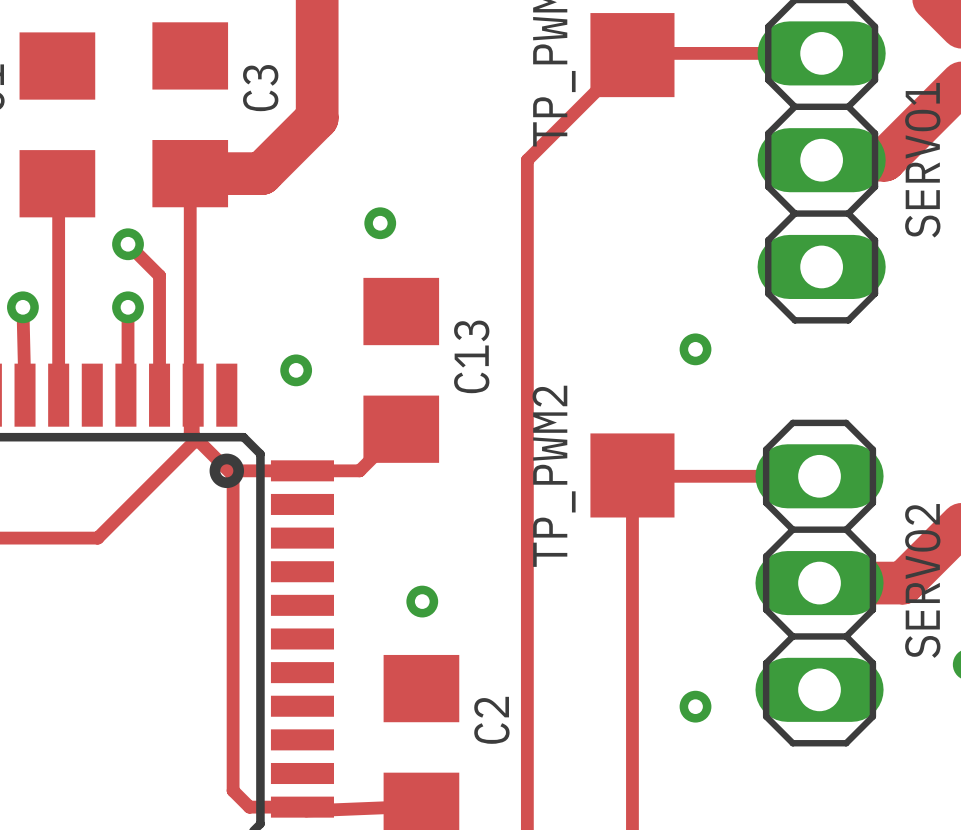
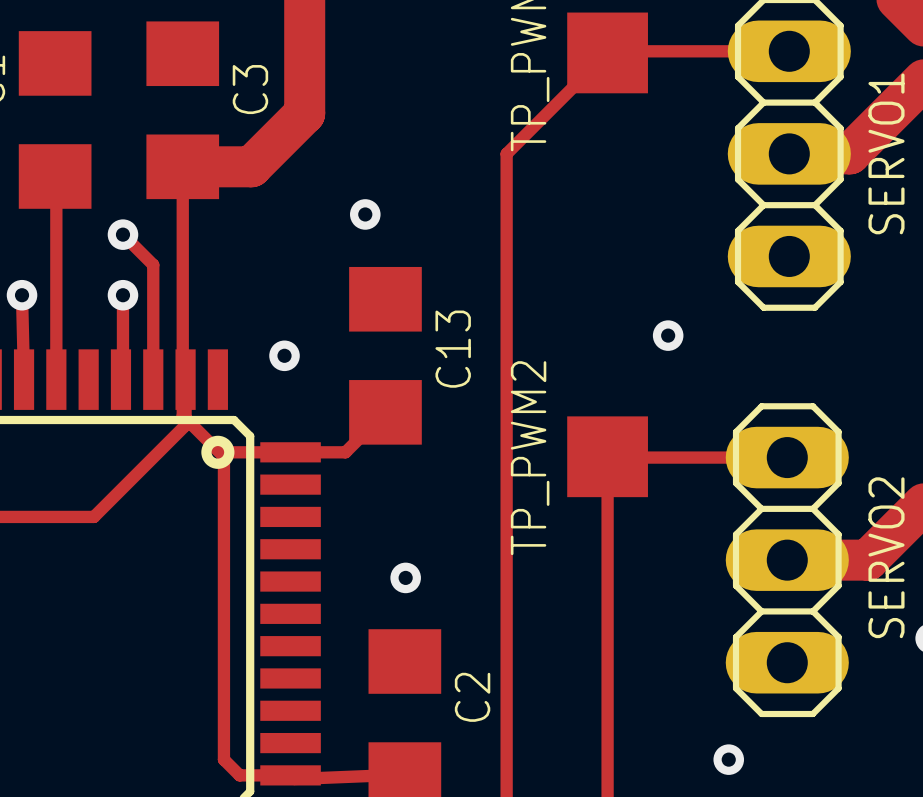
via position: (695, 706) -> (728, 759)

